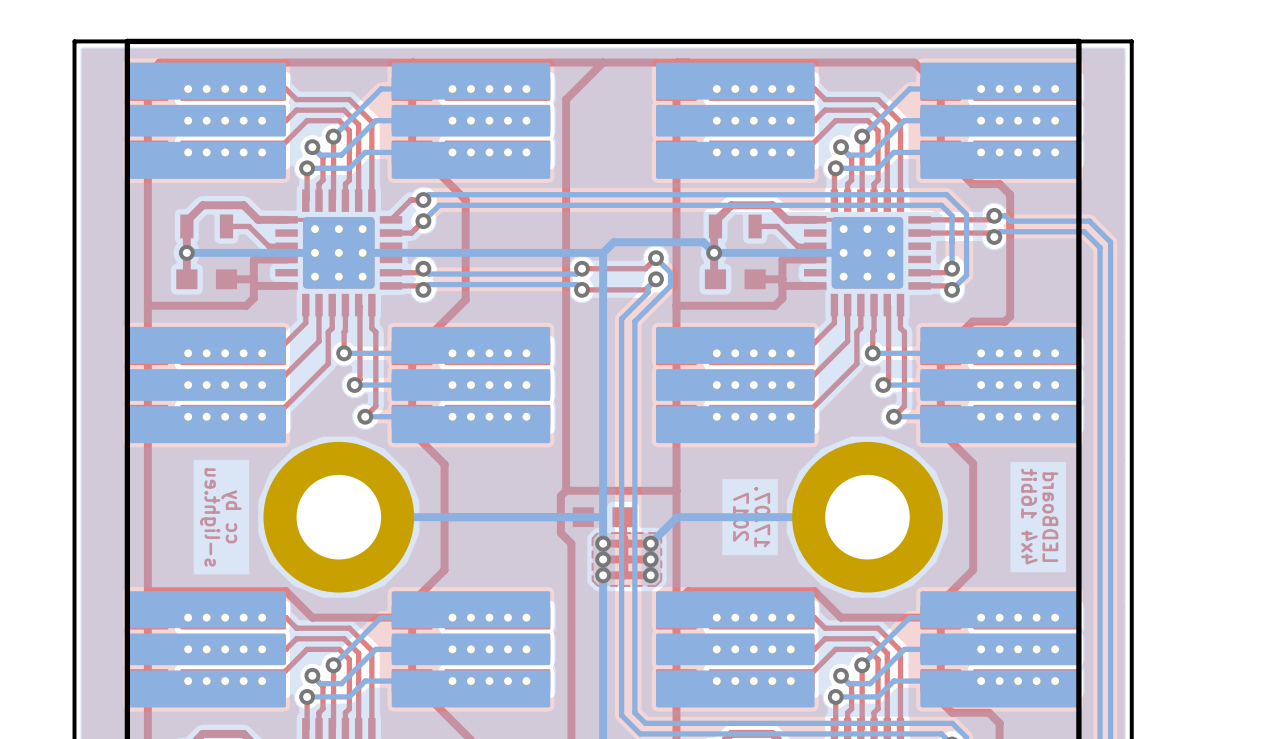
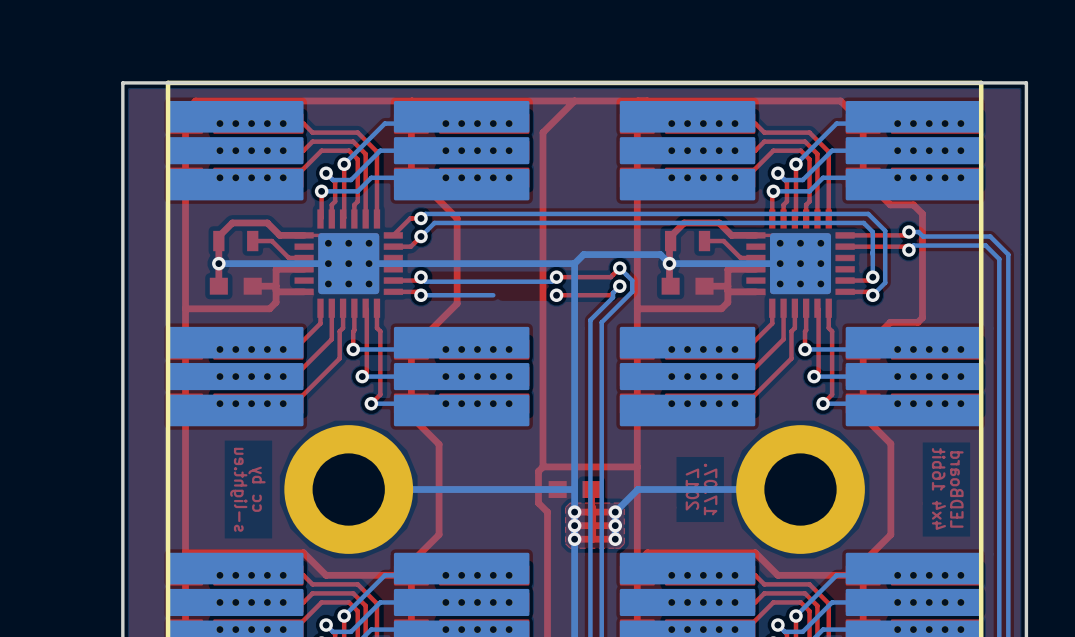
bottom track: (581, 289) (576, 284) (428, 284) (423, 289) -> (493, 295) (421, 295)

